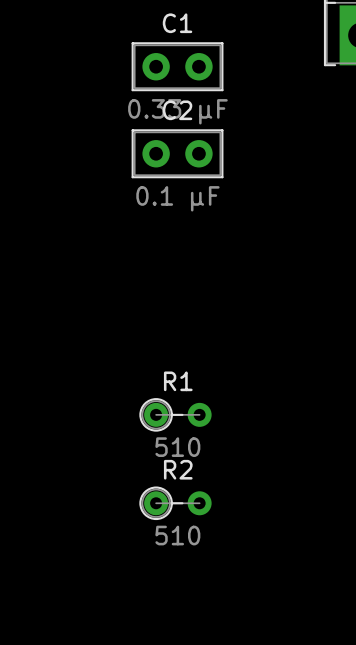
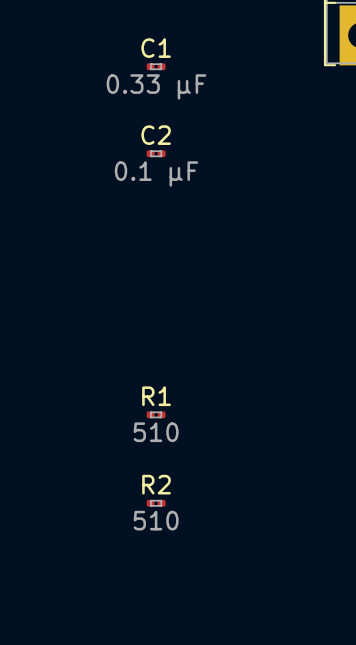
C1 footprint: [131, 42, 224, 92] -> [146, 63, 166, 71]
C2 footprint: [131, 129, 224, 179] -> [146, 150, 166, 158]
R1 footprint: [139, 398, 212, 432] -> [146, 411, 166, 419]
R2 footprint: [139, 486, 212, 521] -> [146, 499, 166, 507]

